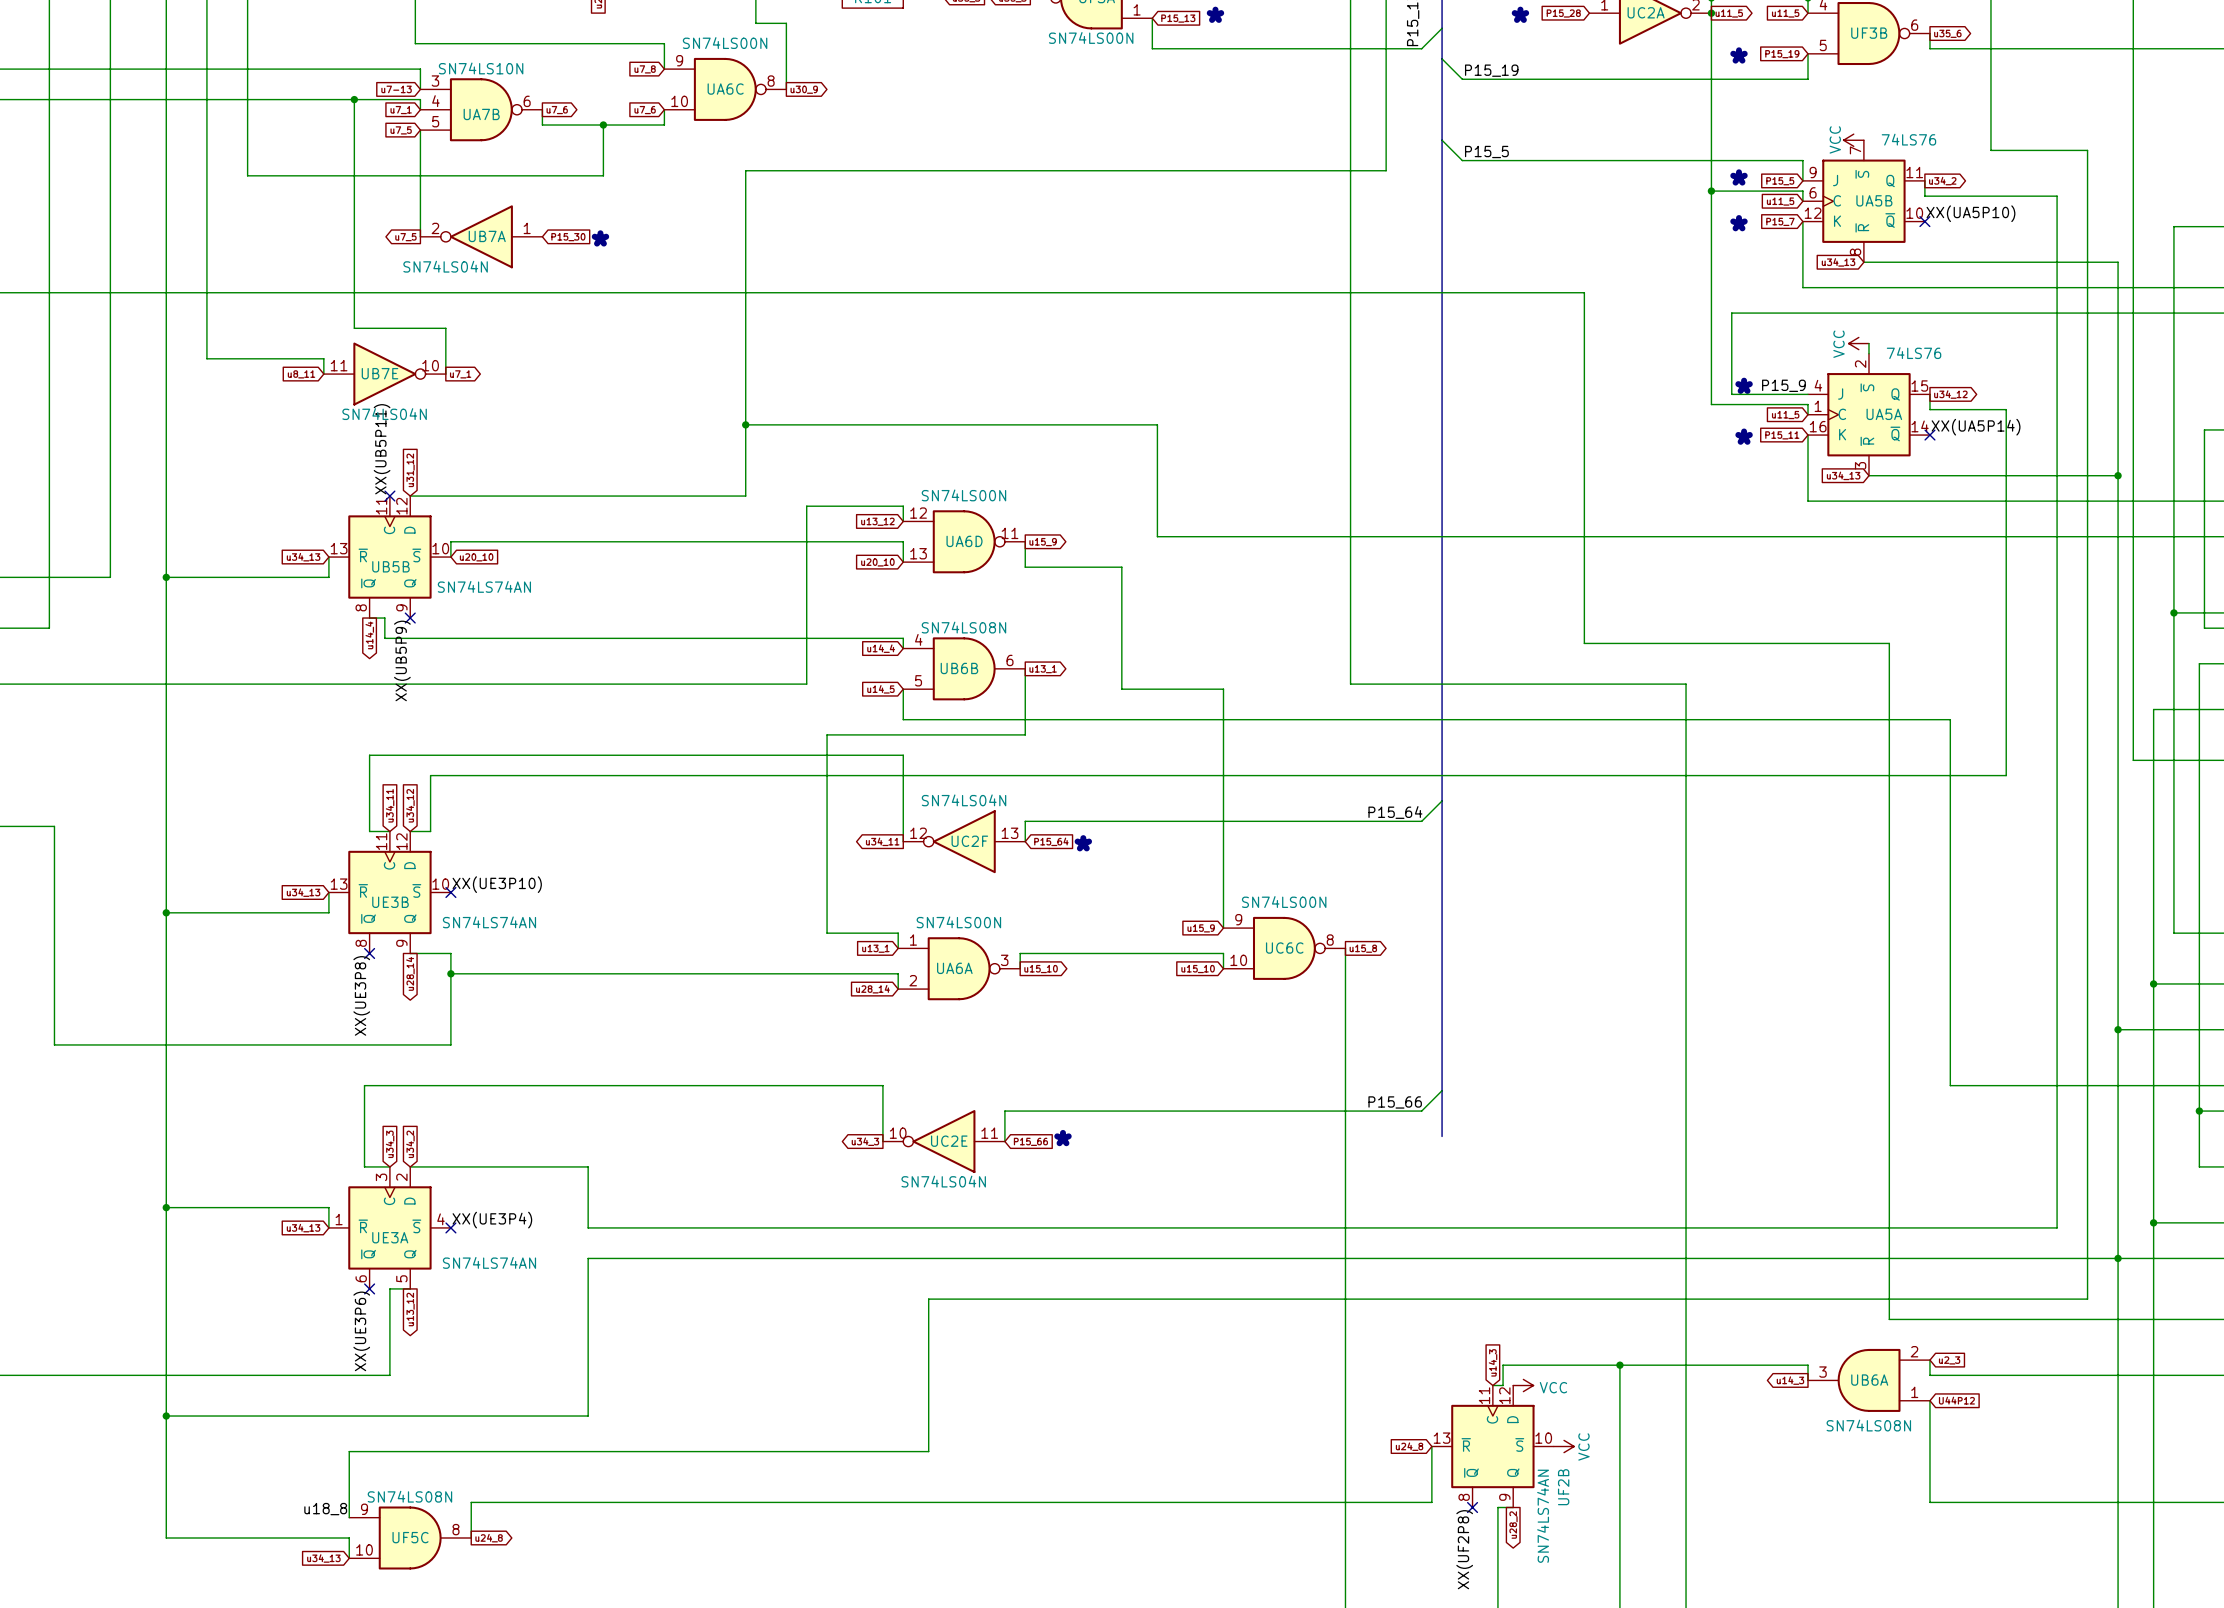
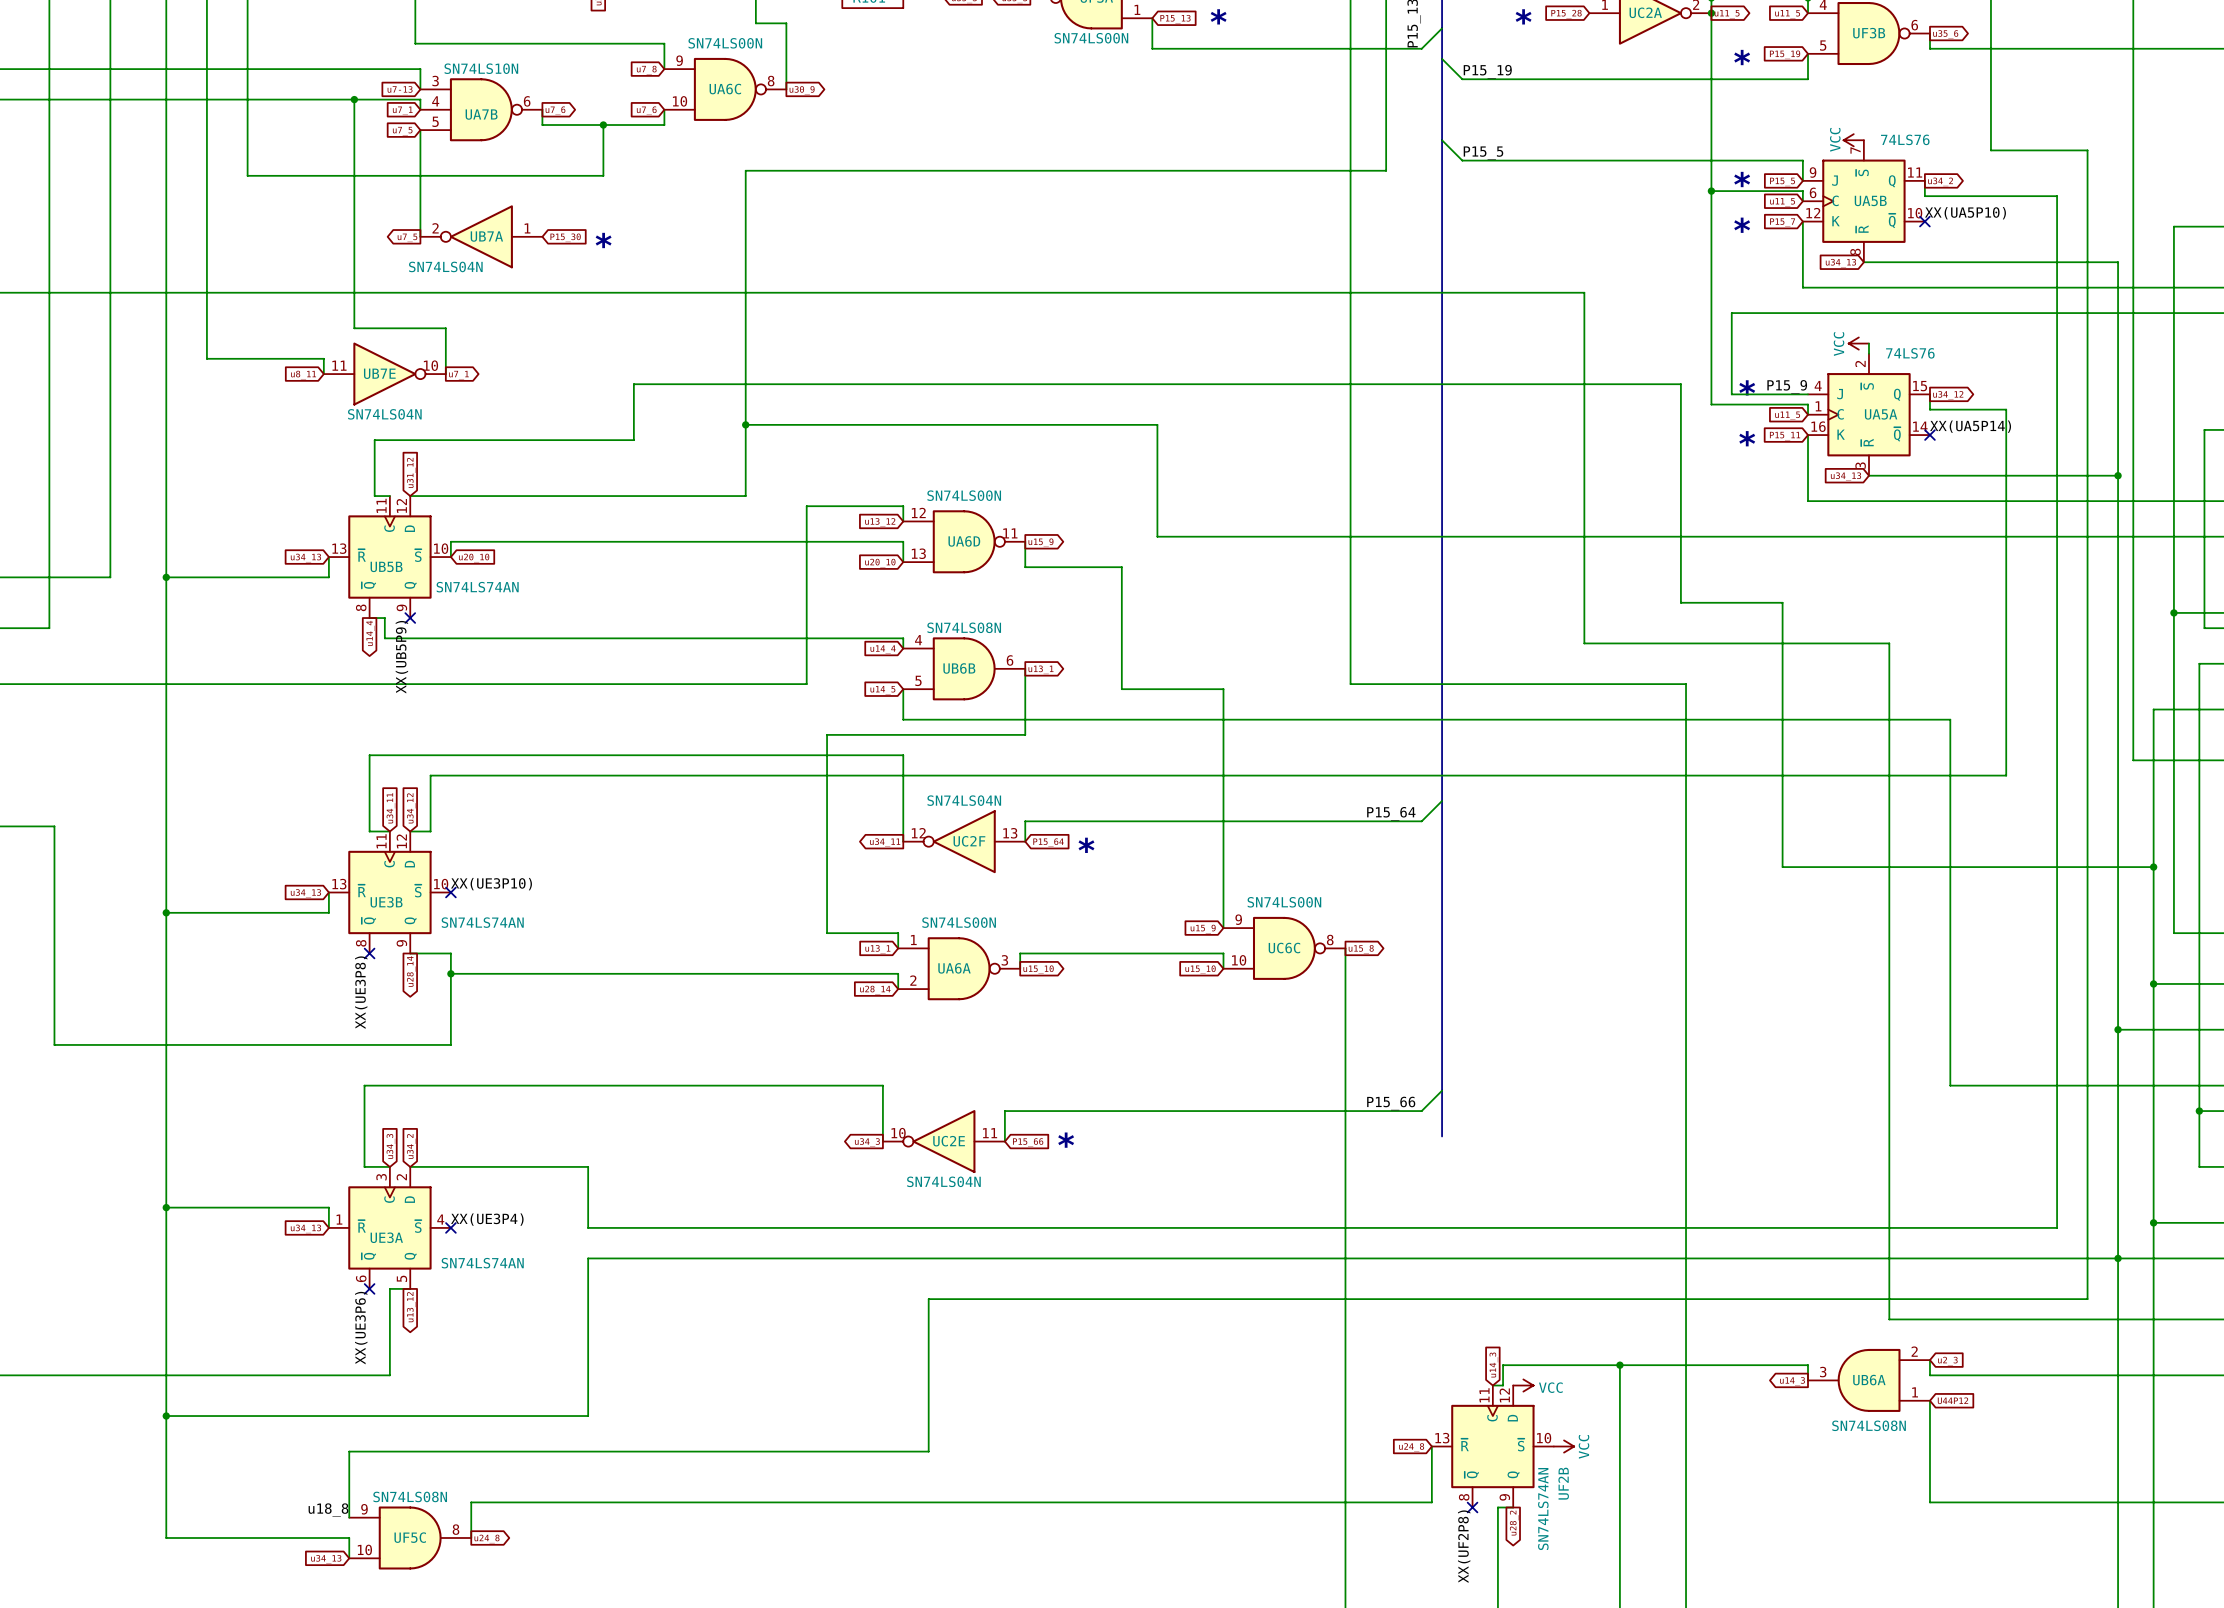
label: XX(UB5P11) (382, 449) -> none
wire: none -> (389, 496) (374, 496) (374, 440) (633, 440) (633, 384) (1680, 384) (1680, 602) (1782, 602) (1782, 867) (2153, 867)
no-connect mark: (389, 496) -> none
junction: none -> (2153, 867)

